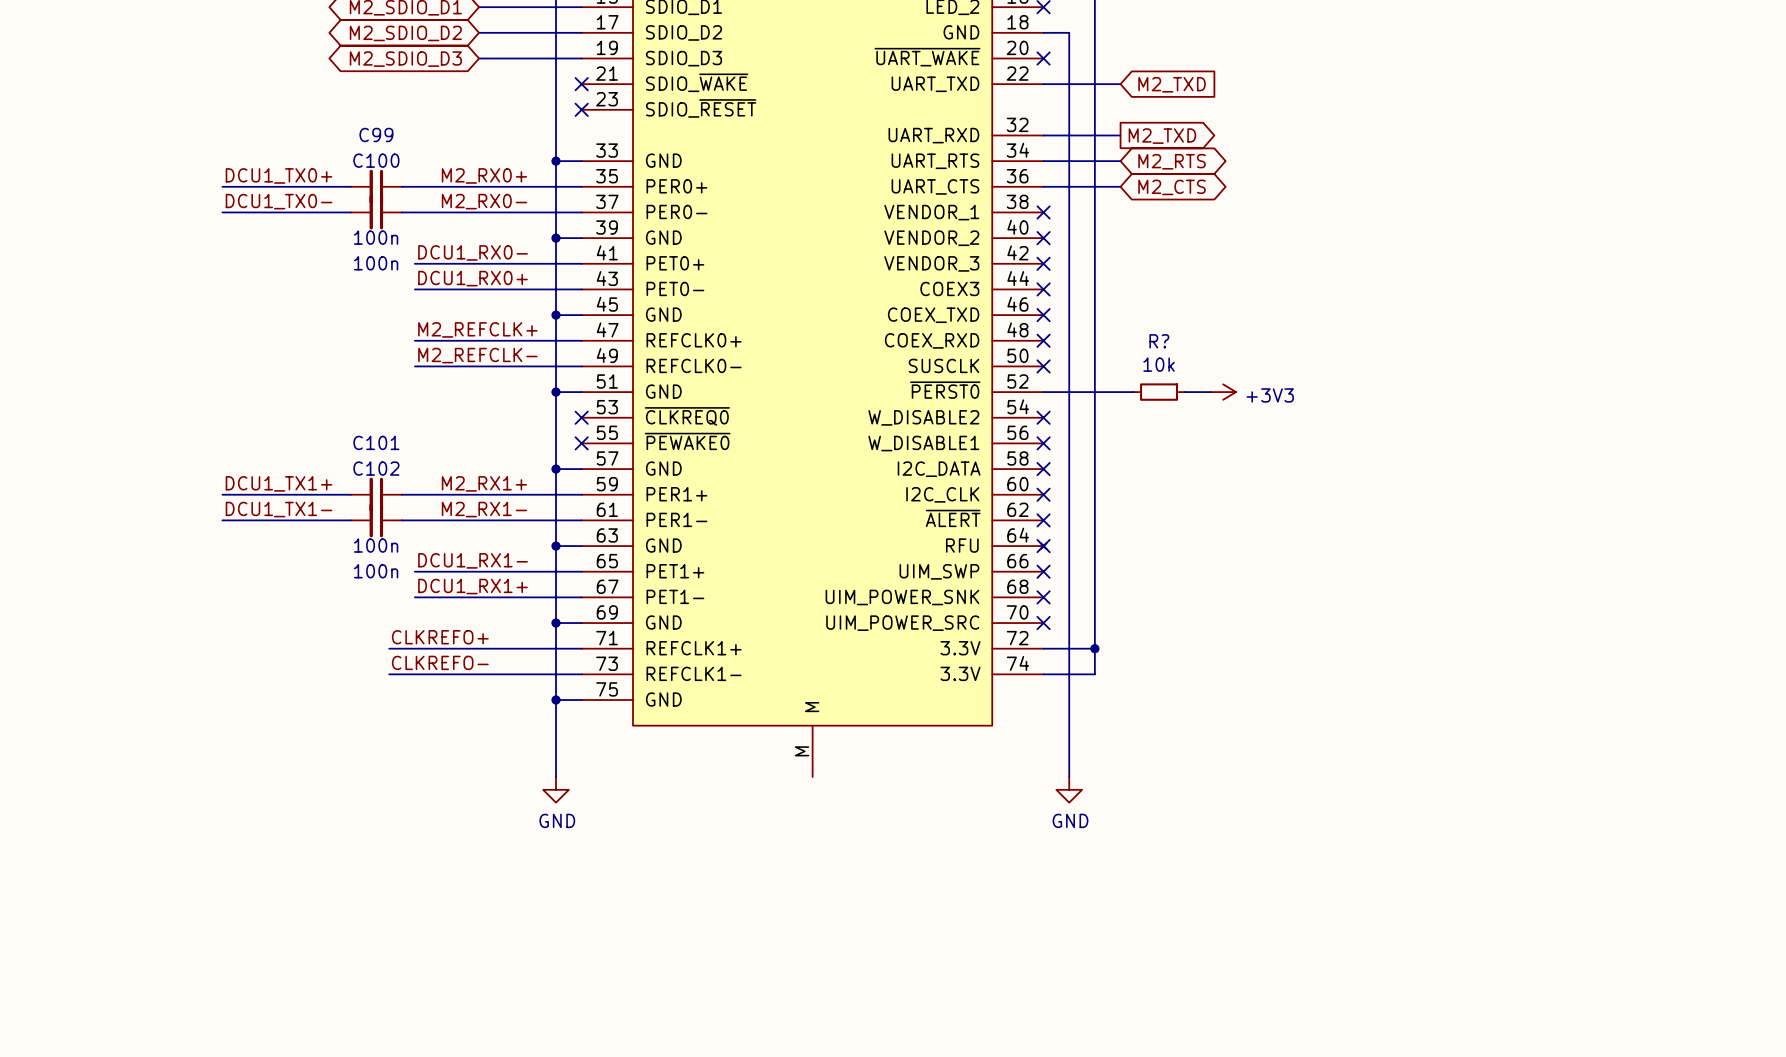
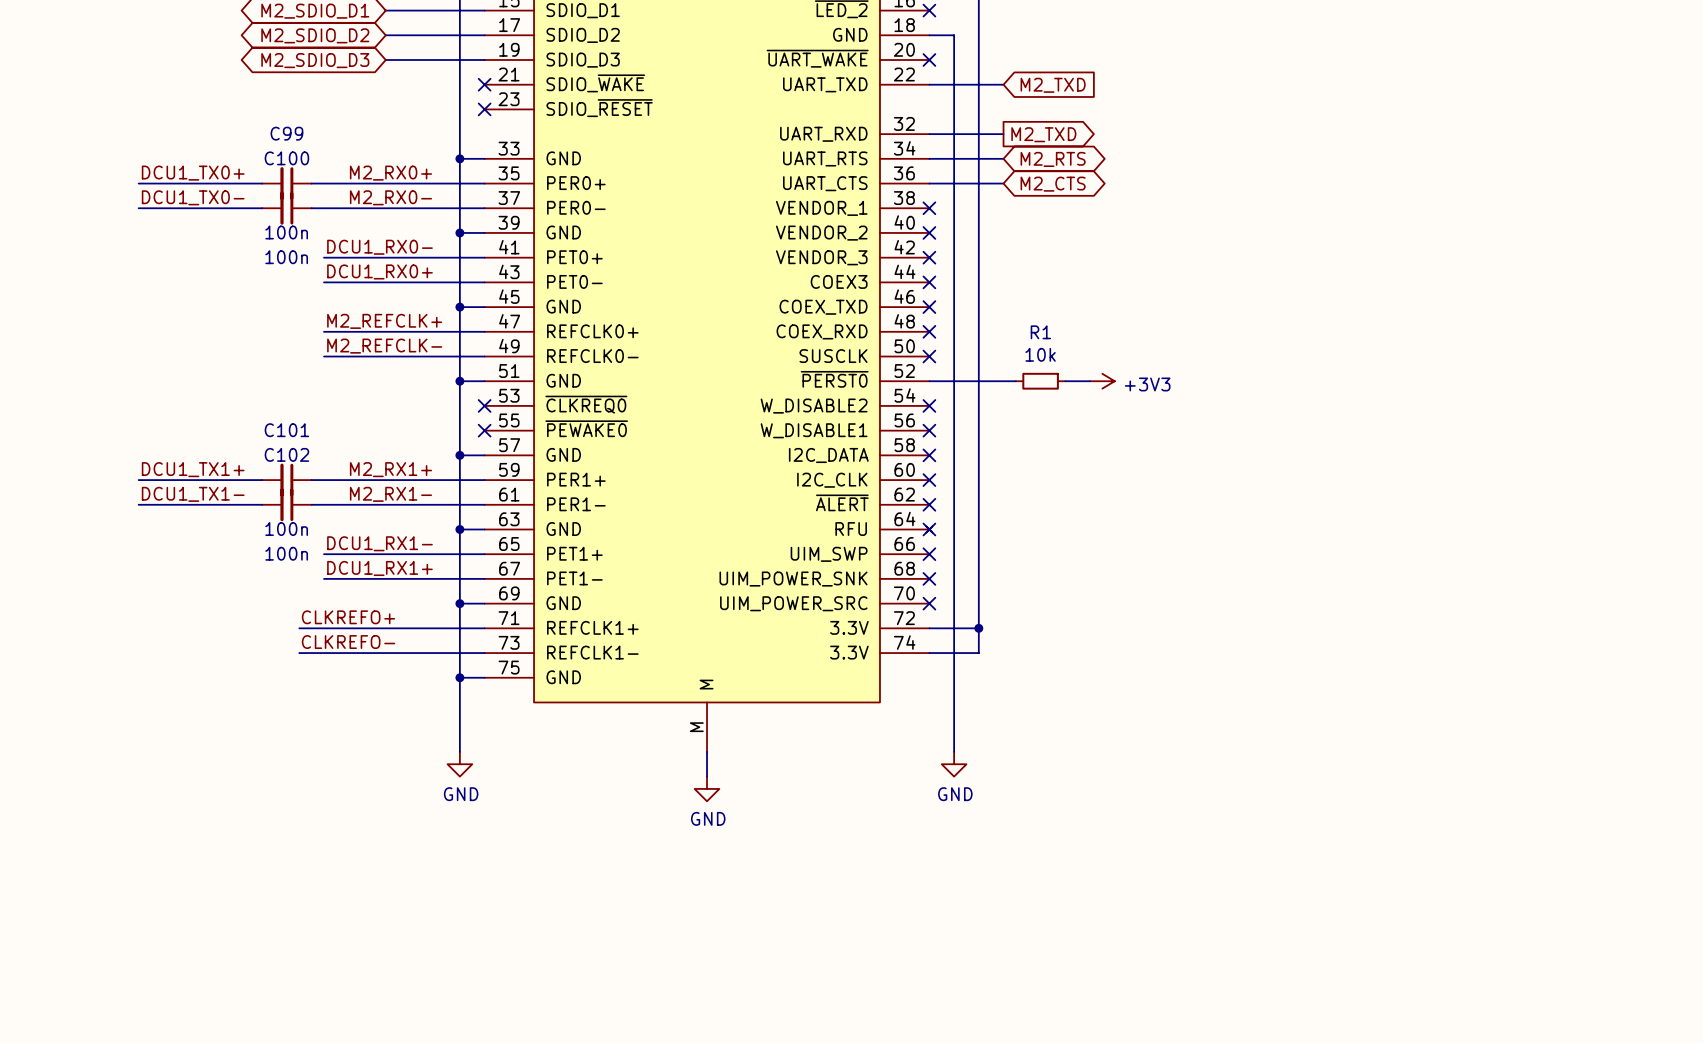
R? name: R? (1159, 341) -> R1 (1040, 332)
wire: none -> (707, 751) (707, 776)
power symbol: none -> GND (707, 788)

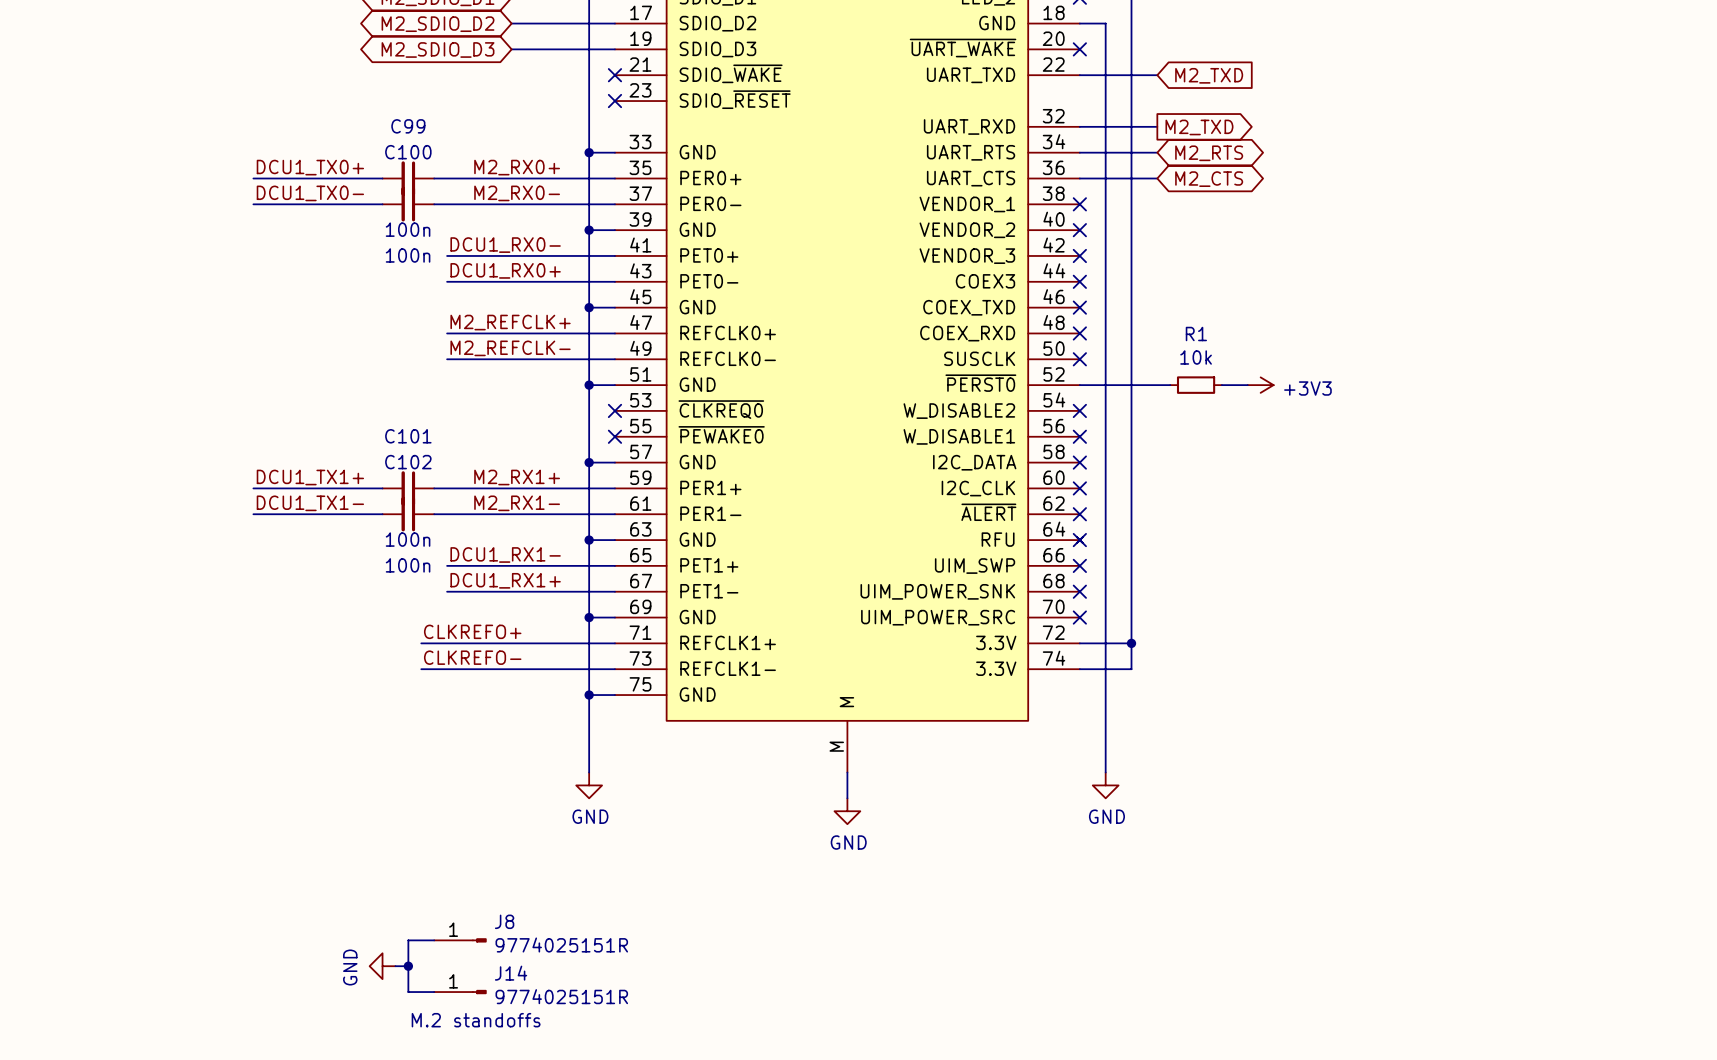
wire: none -> (434, 940) (408, 940) (408, 992) (434, 992)
J8: none -> 9774025151R (460, 940)
power symbol: none -> GND (382, 966)
wire: none -> (395, 966) (408, 966)
junction: none -> (408, 966)
J14: none -> 9774025151R (460, 992)
text: none -> M.2 standoffs (476, 1020)

